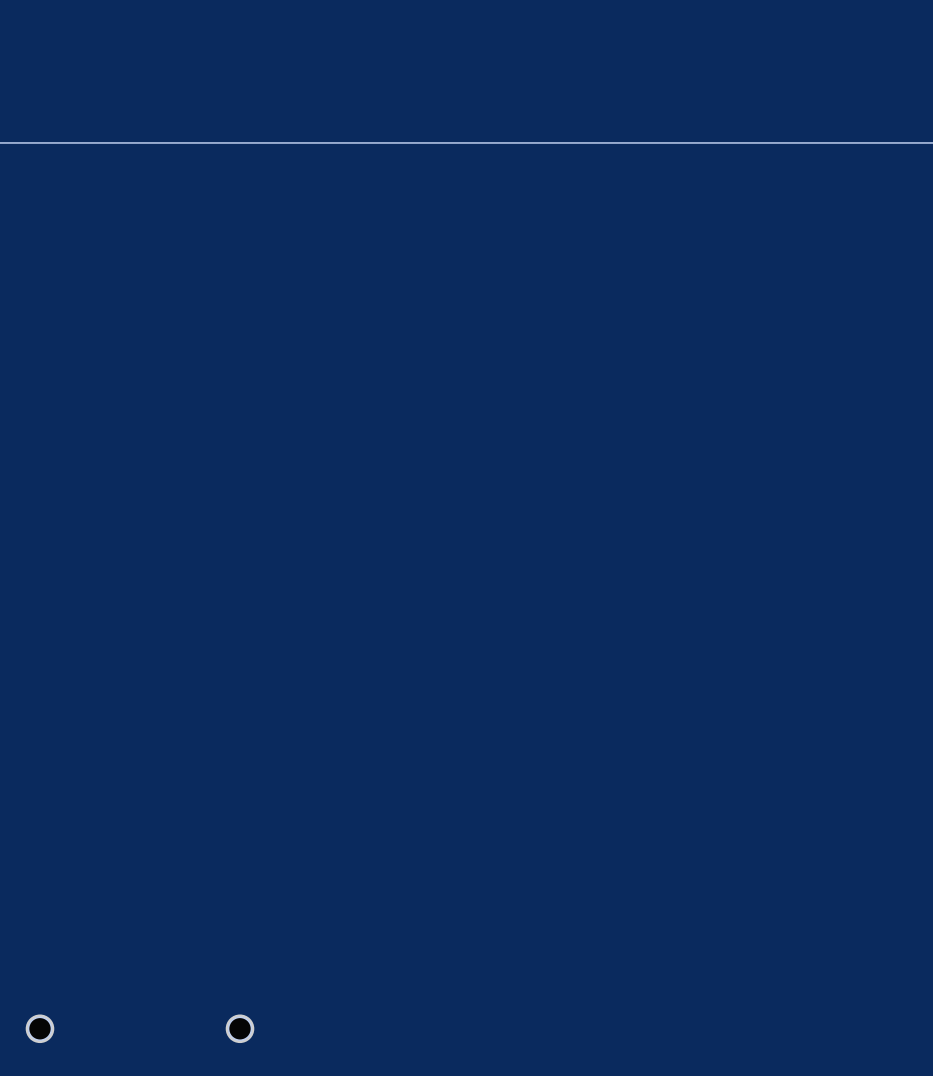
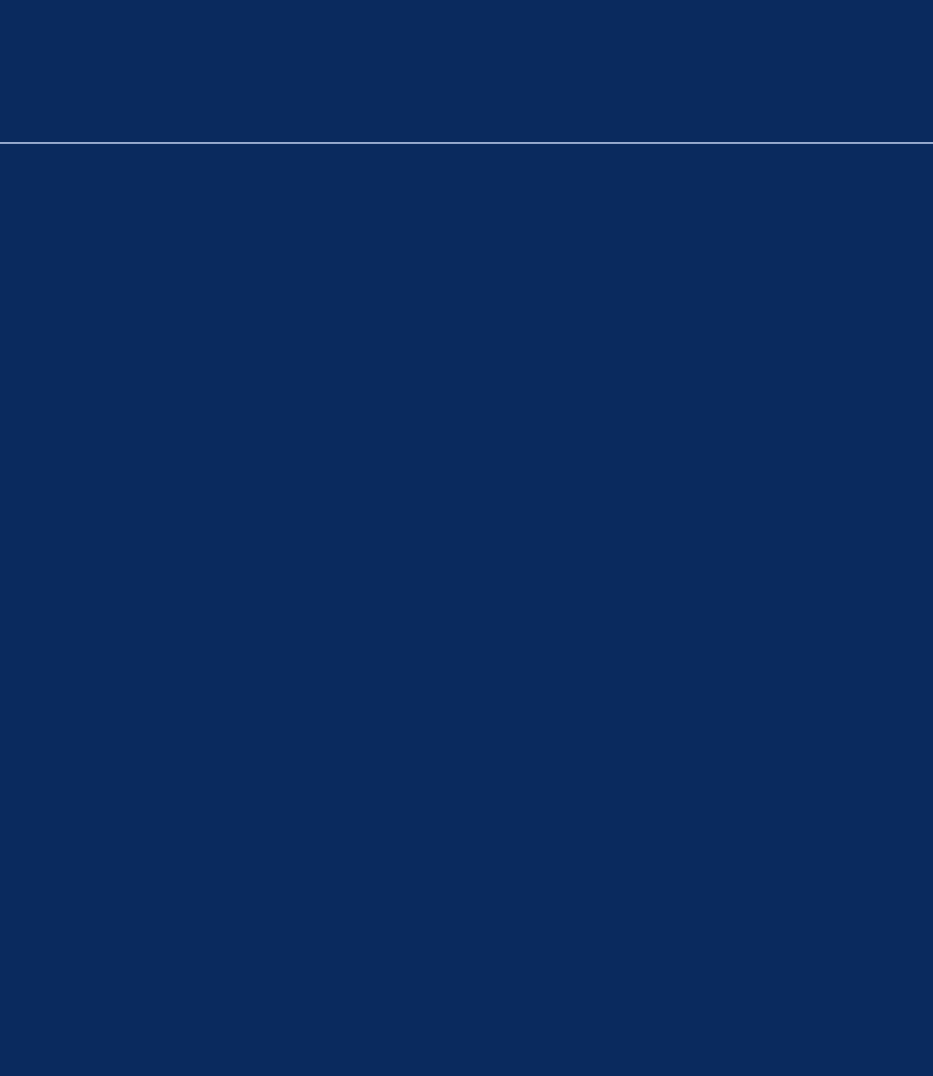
part: (39, 1028) -> none
part: (240, 1028) -> none

